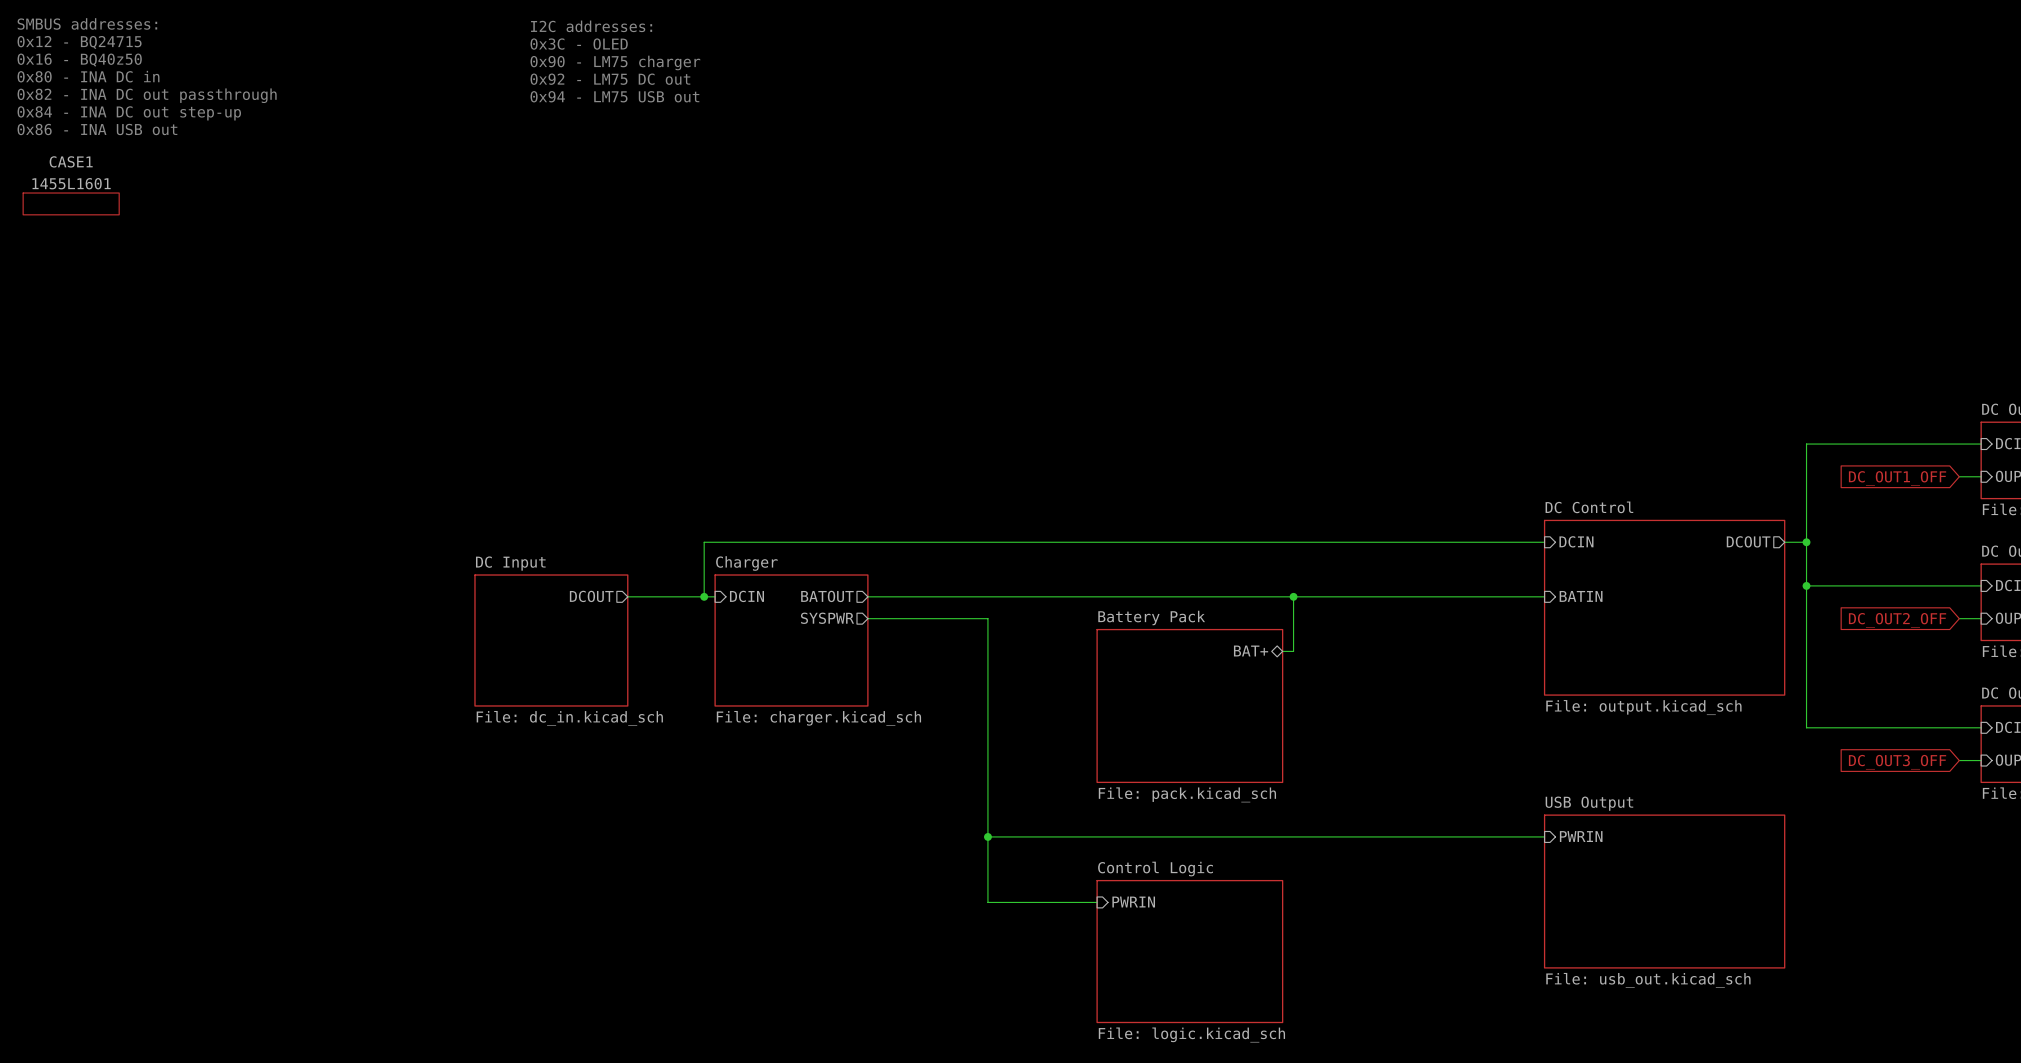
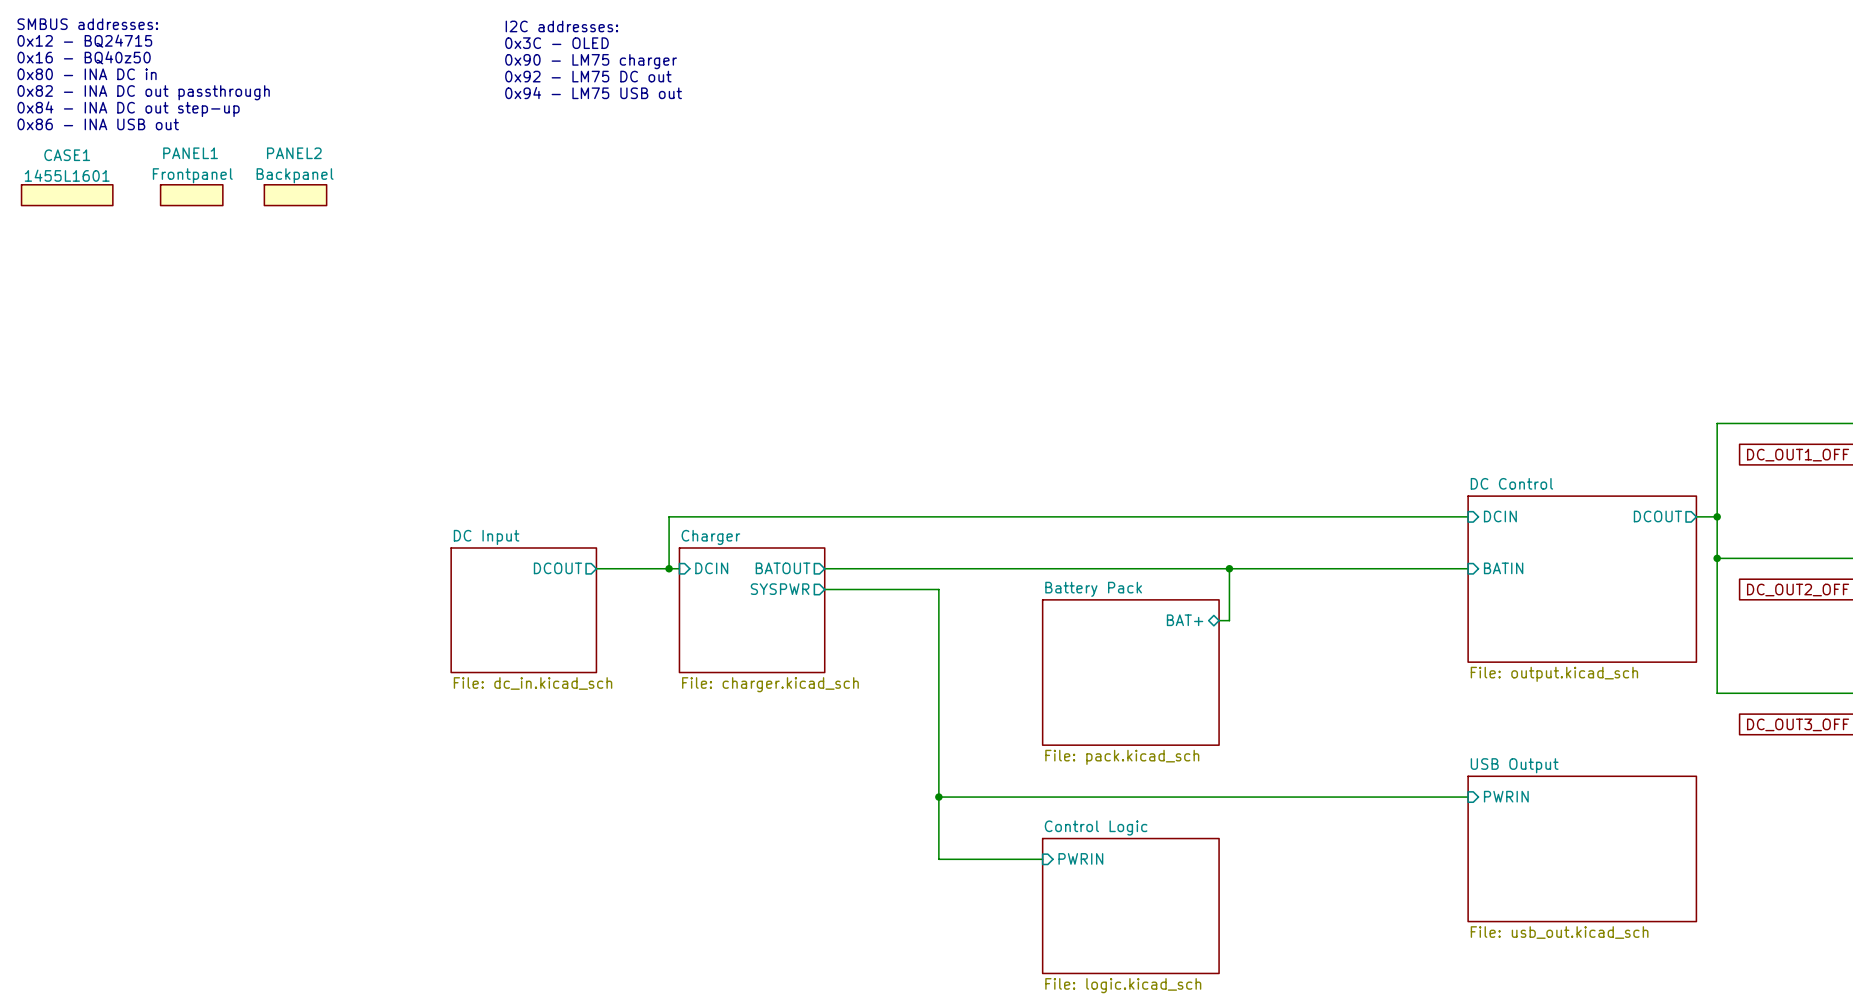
PANEL1: none -> Frontpanel (191, 195)
PANEL2: none -> Backpanel (295, 195)

